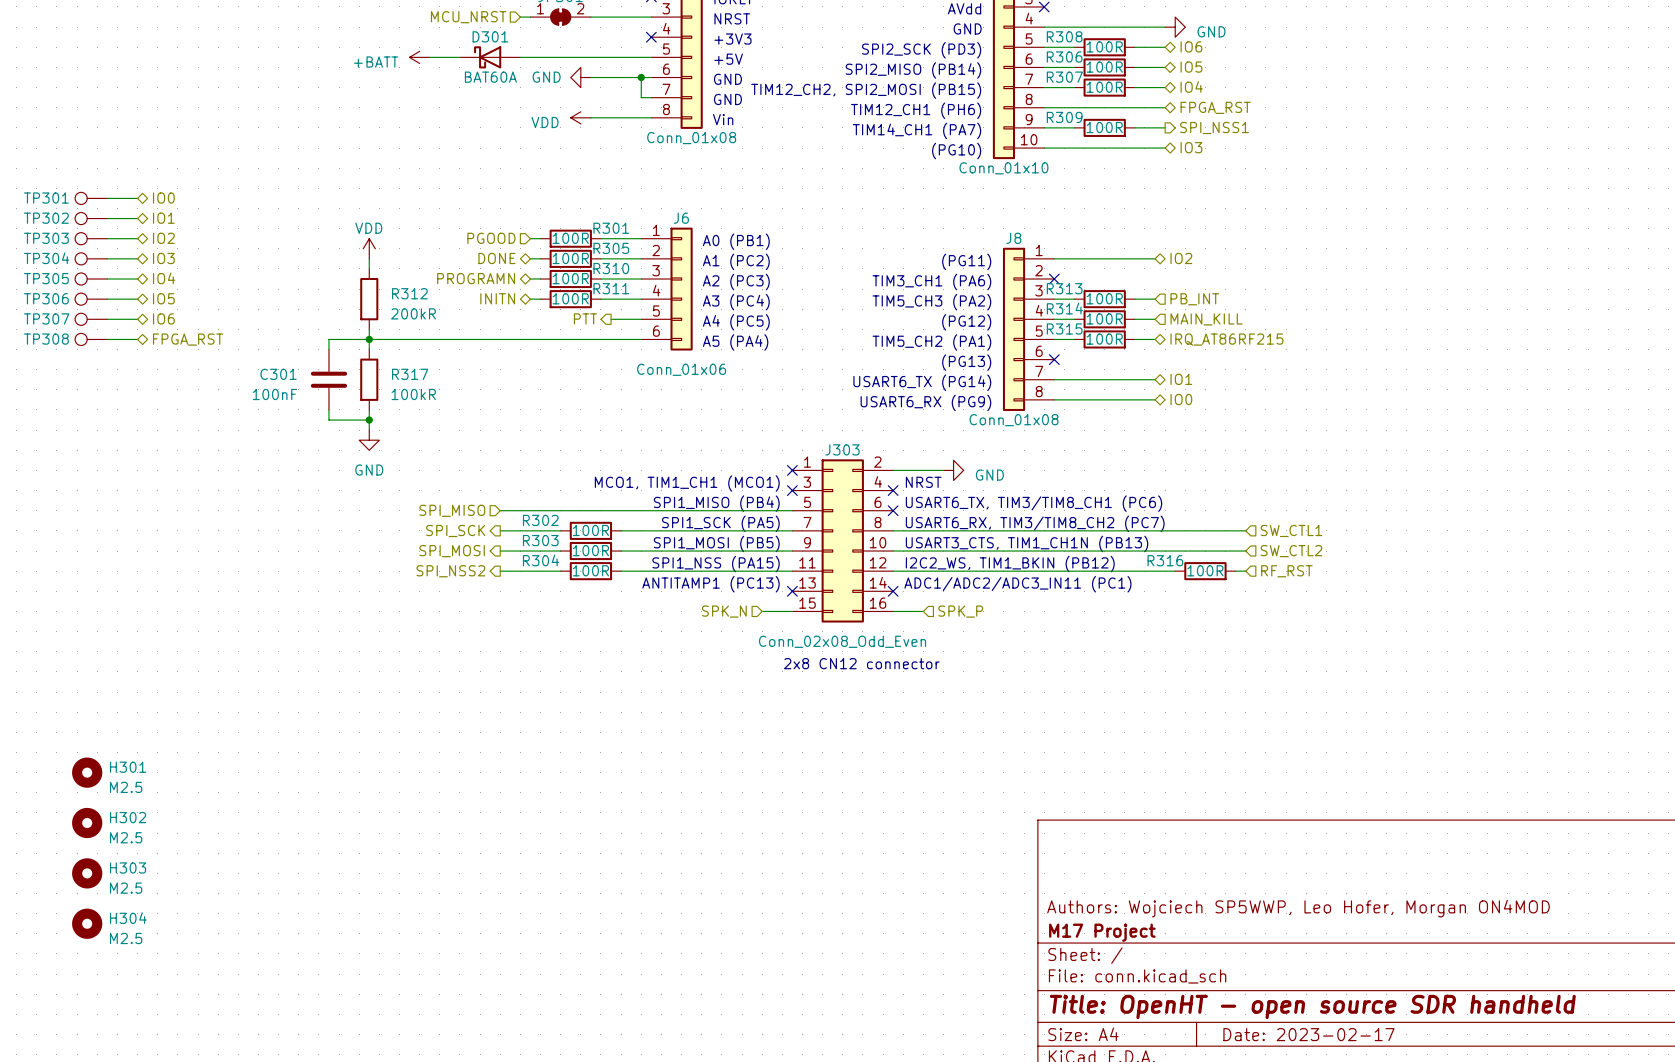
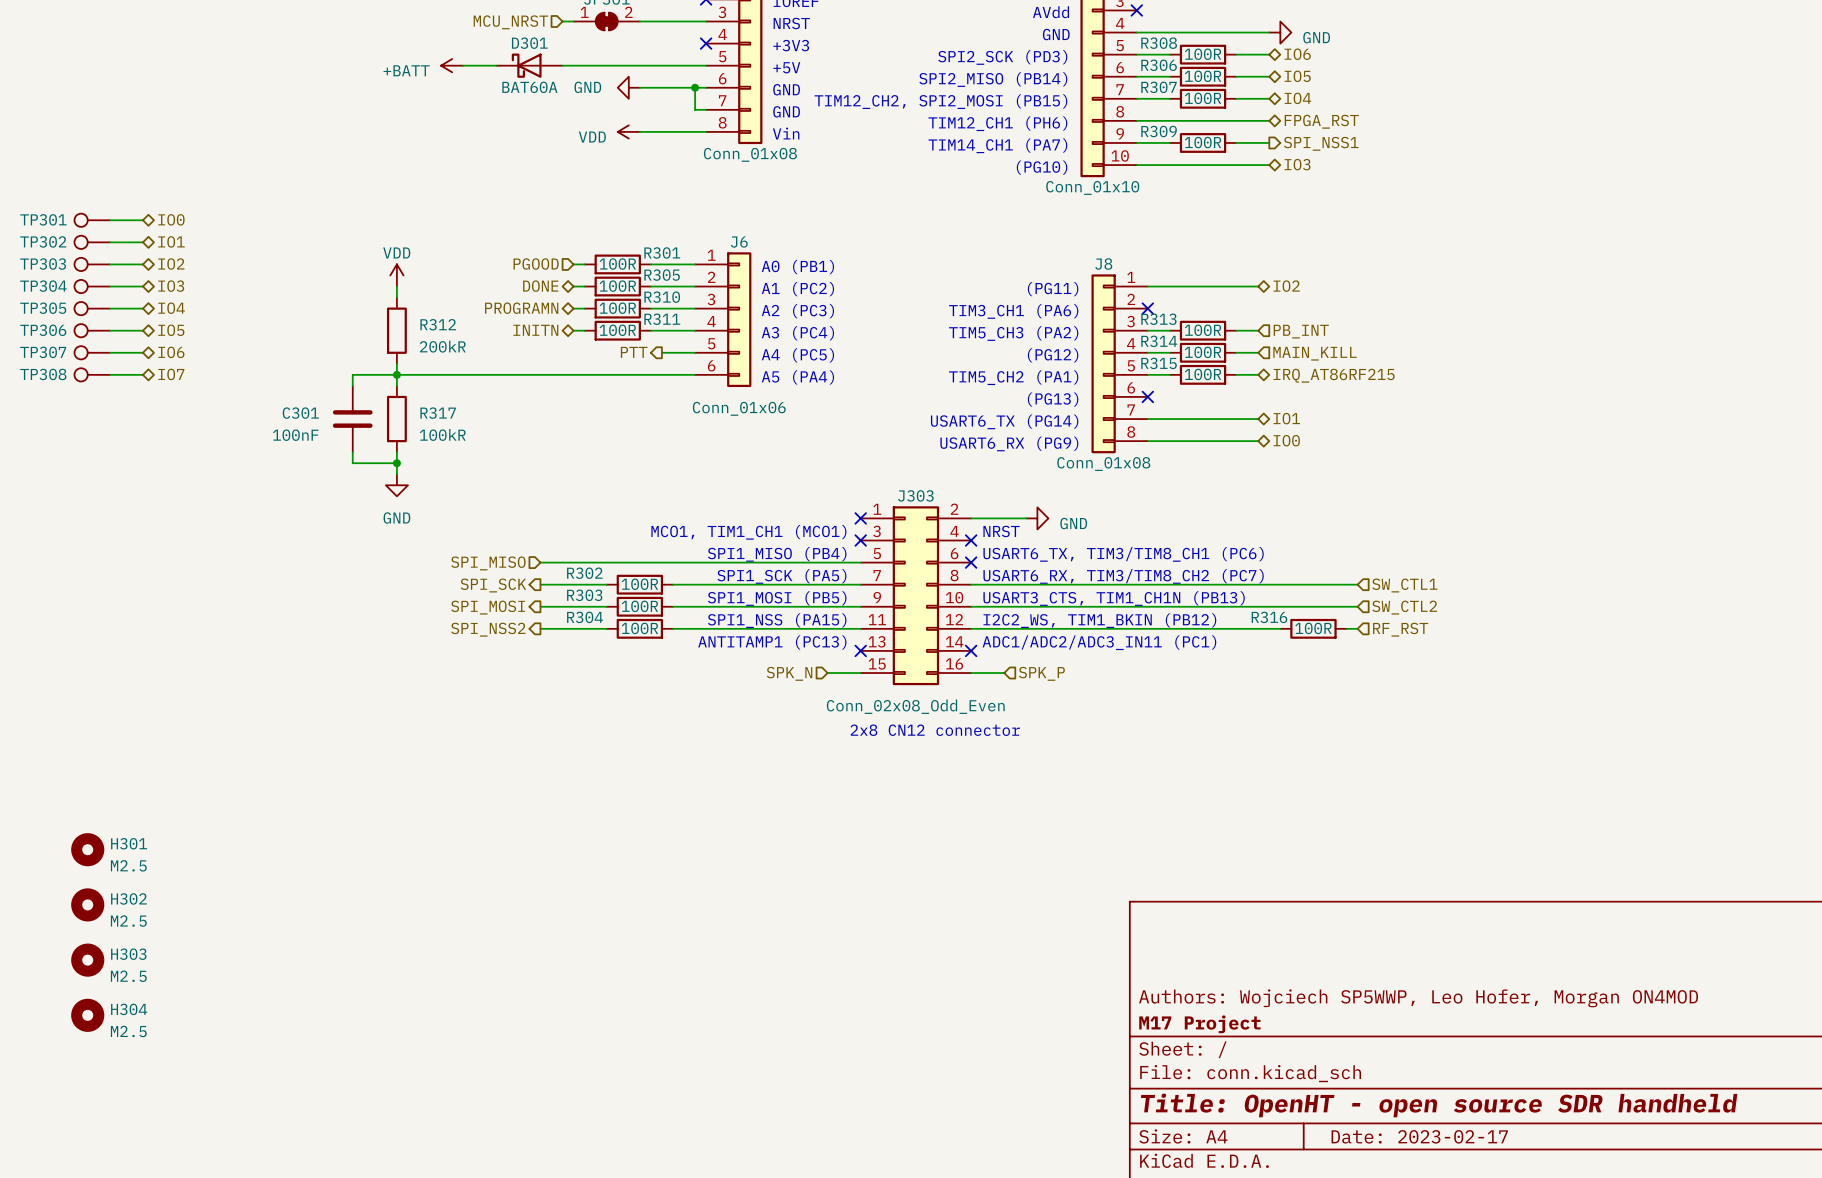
hierarchical label: FPGA_RST (188, 339) -> IO7 (171, 374)

